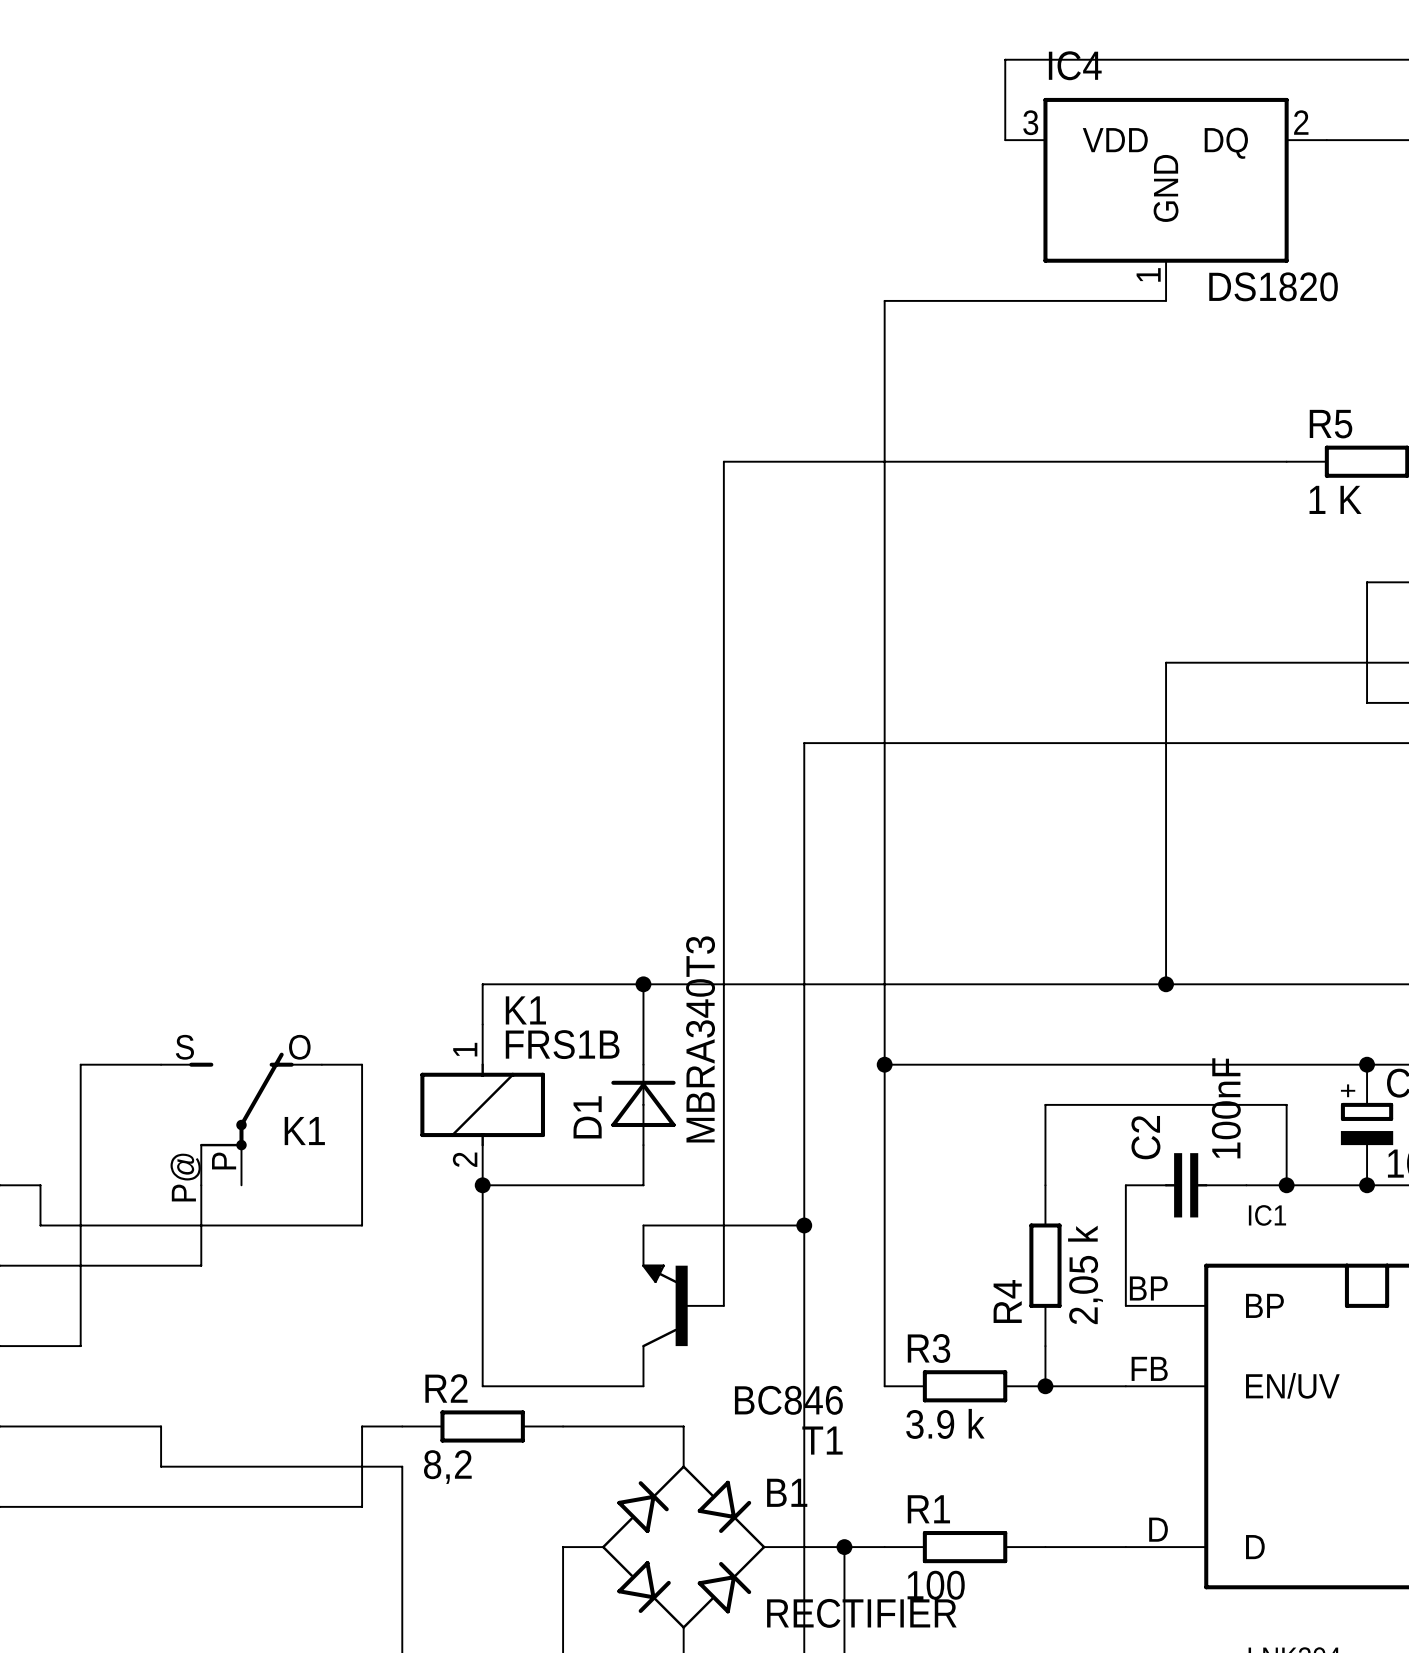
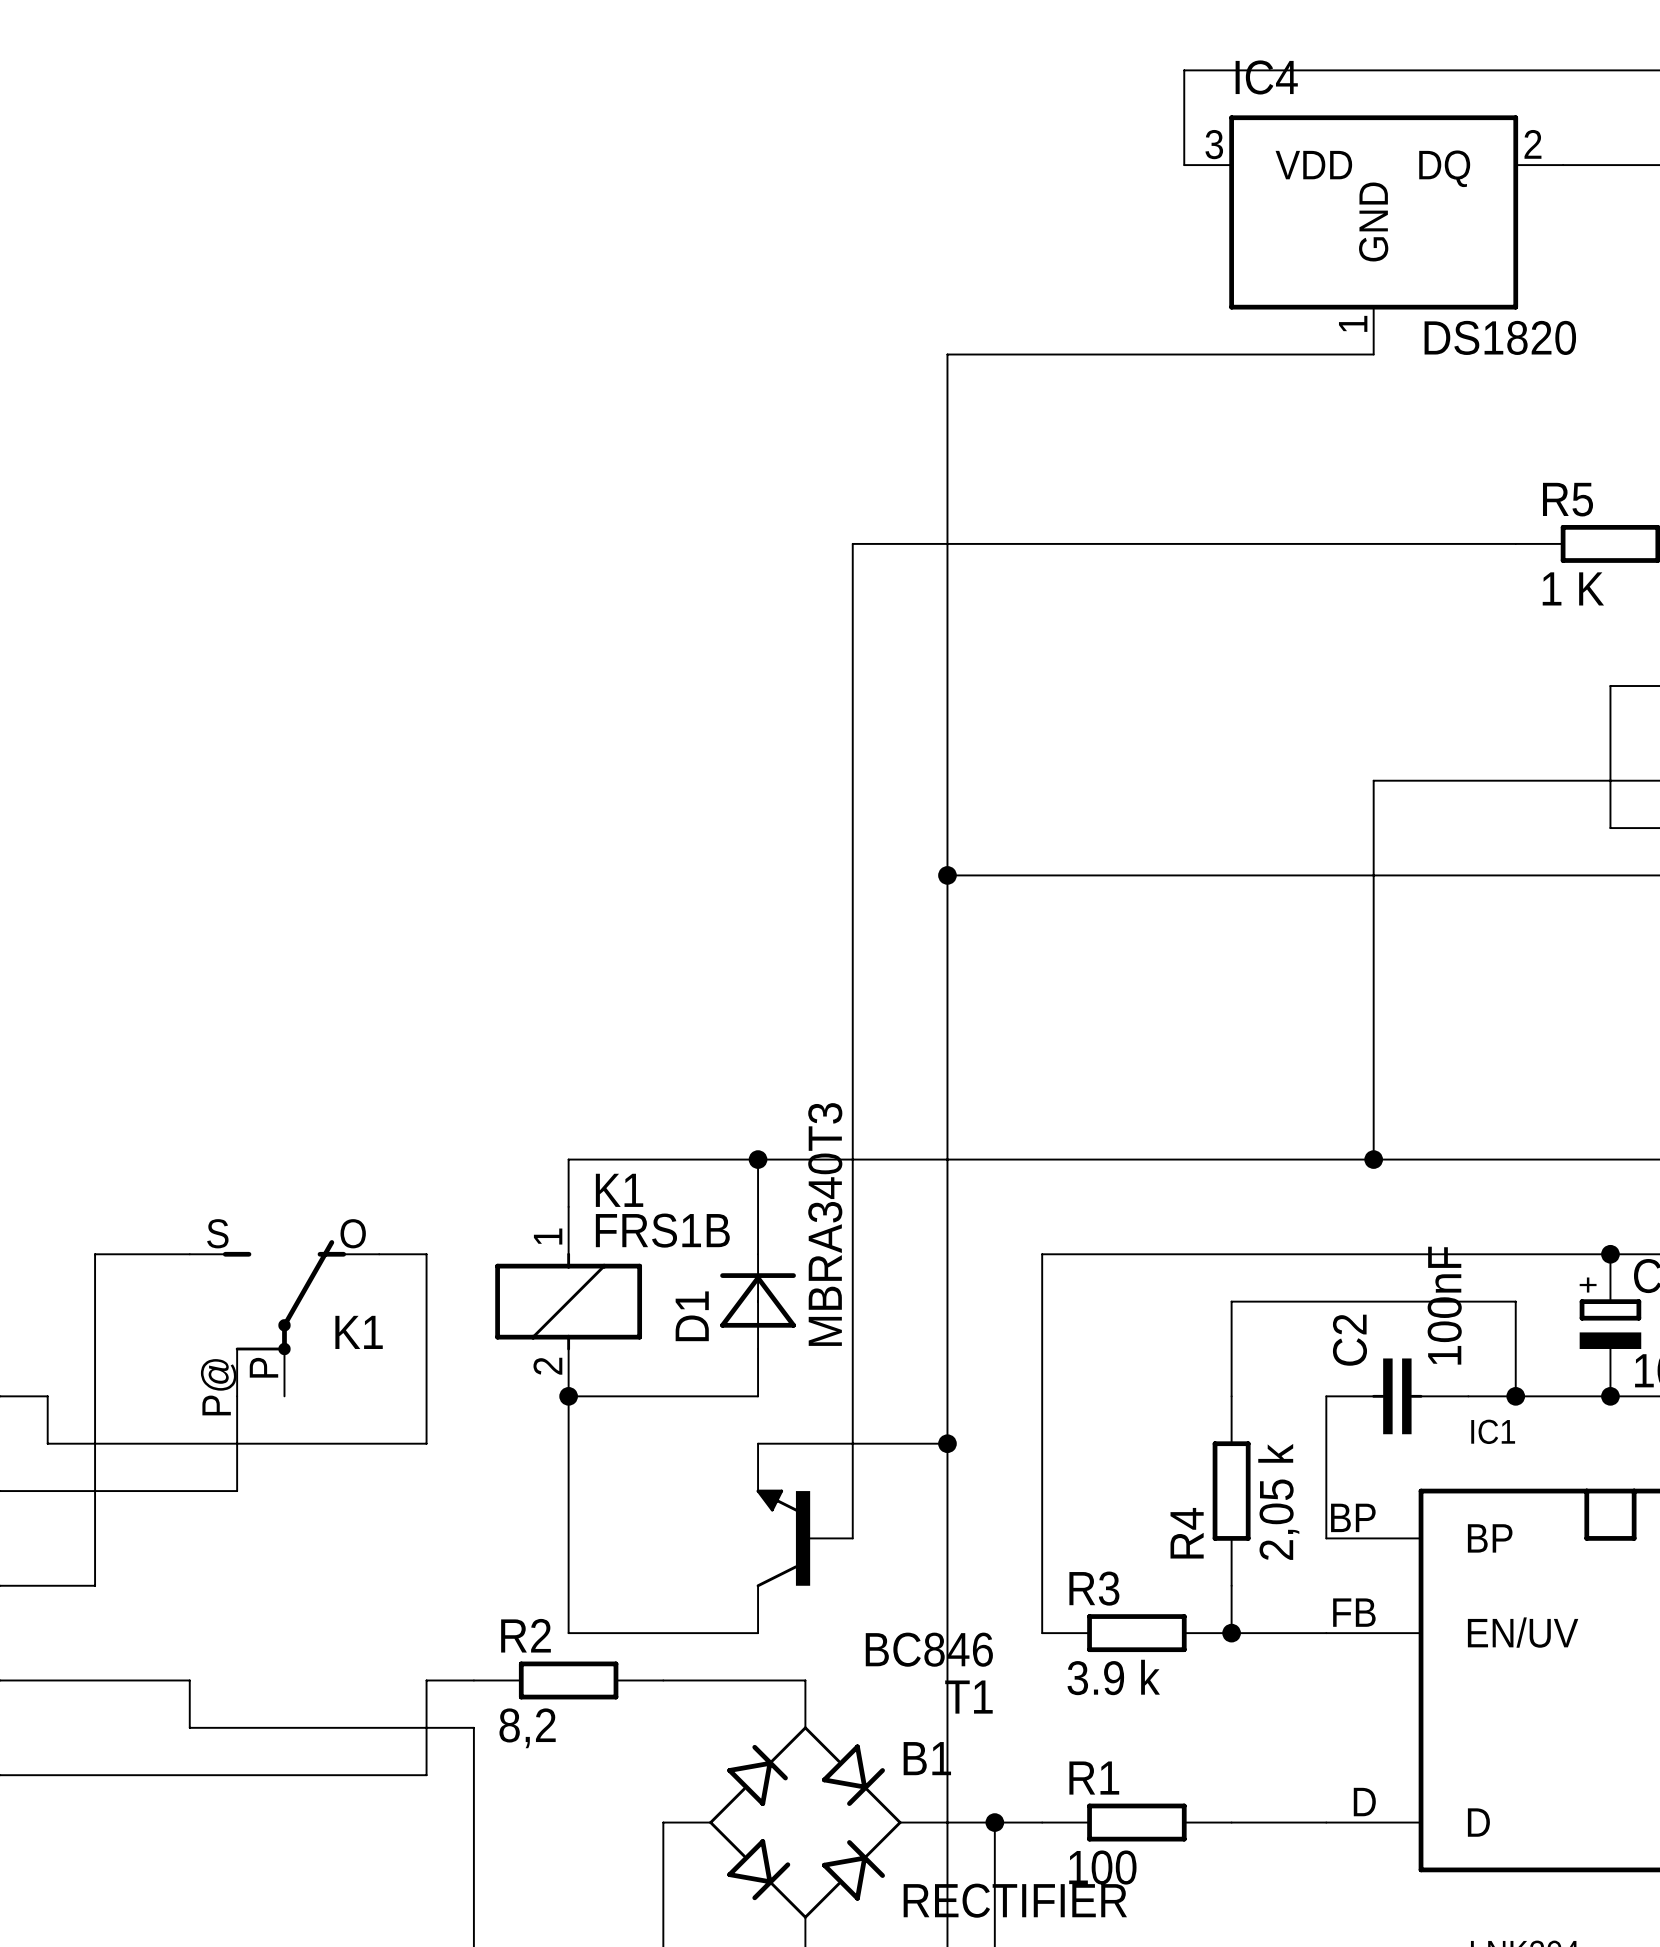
wire: (884, 300) (884, 1064) -> (1042, 354) (947, 354) (947, 875)
junction: none -> (947, 875)
junction: (884, 1064) -> none

